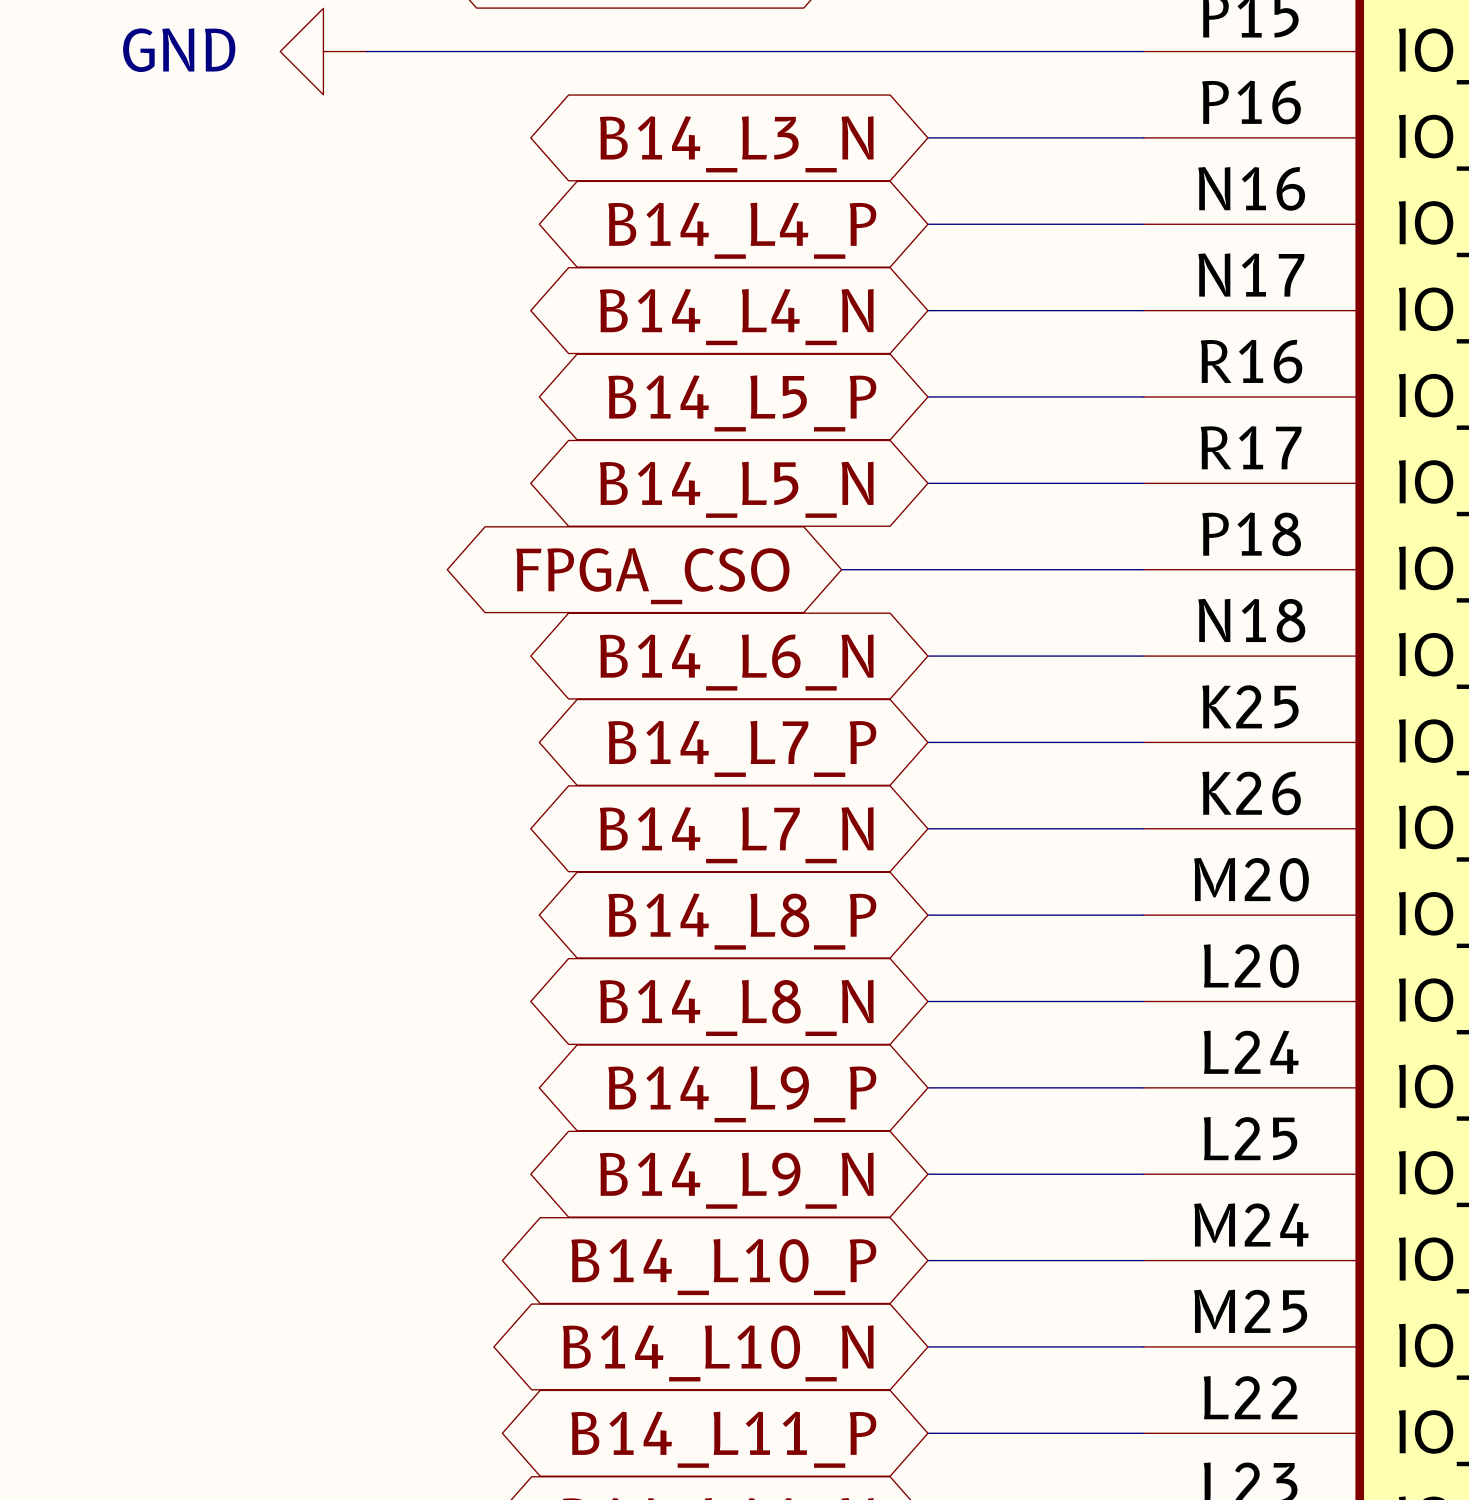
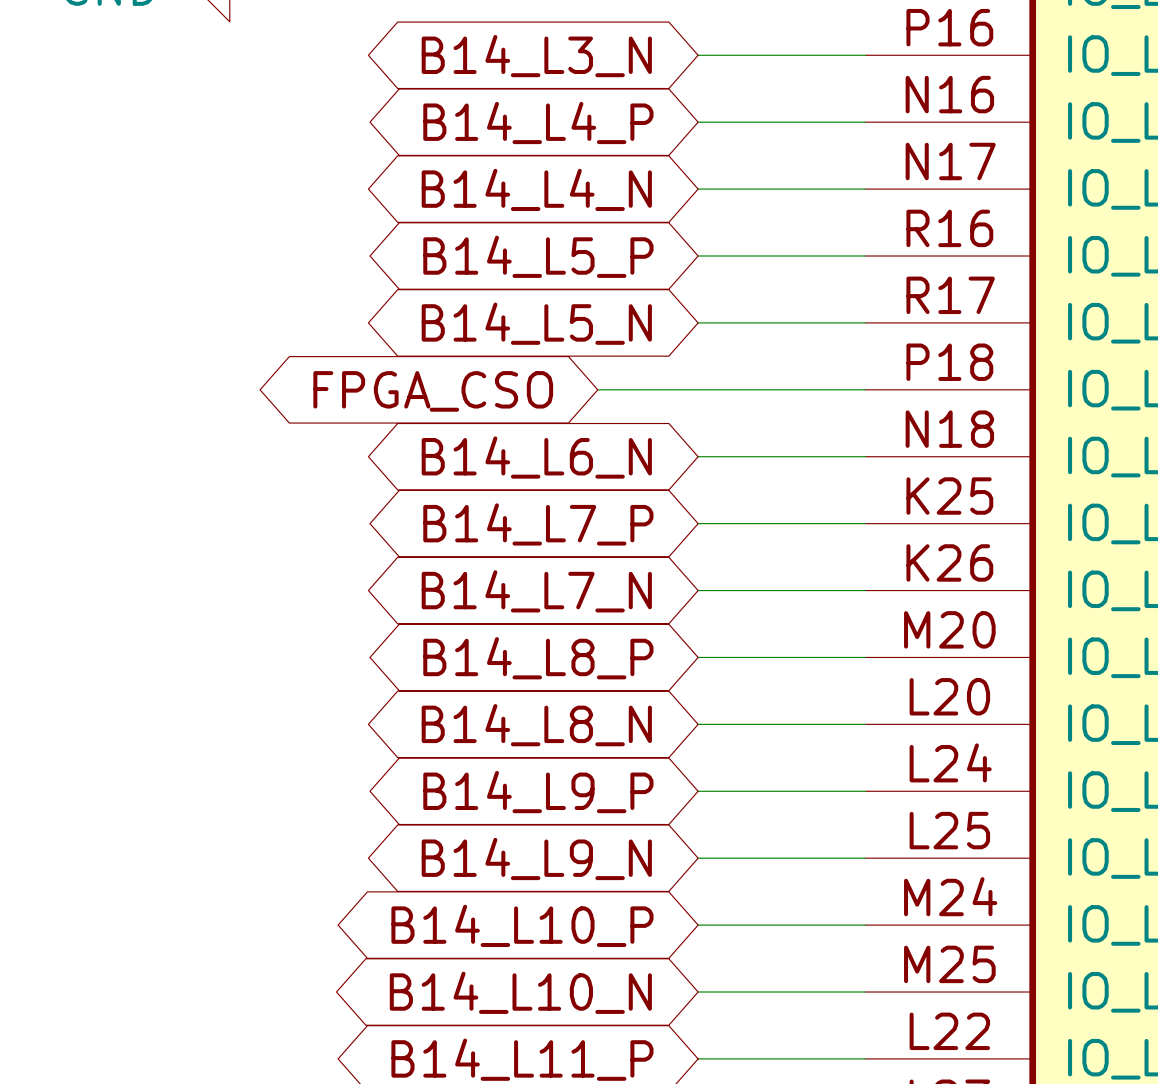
wire: none -> (597, 389) (631, 389)
global label position: FPGA_CSO (652, 576) -> FPGA_CSO (433, 391)

